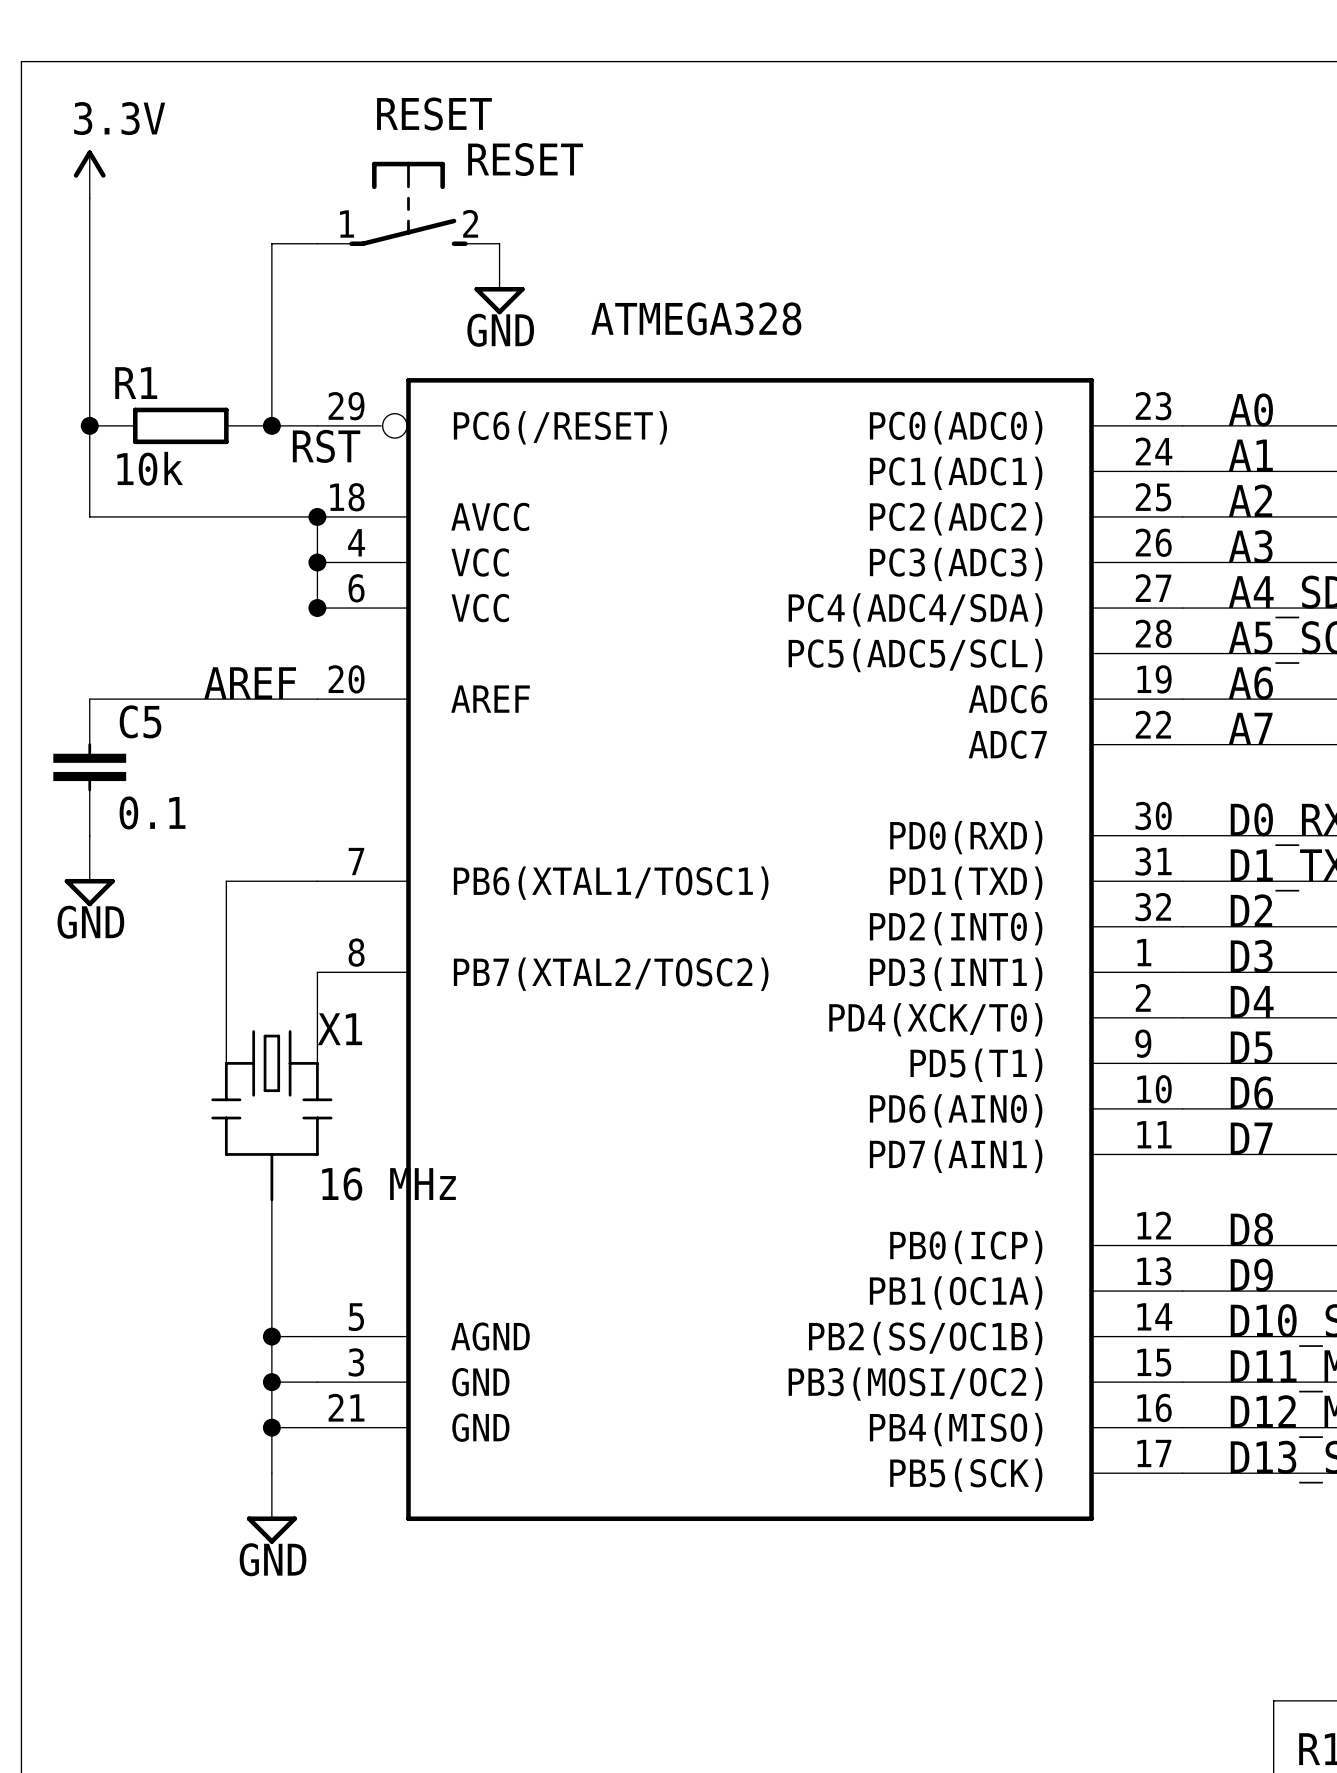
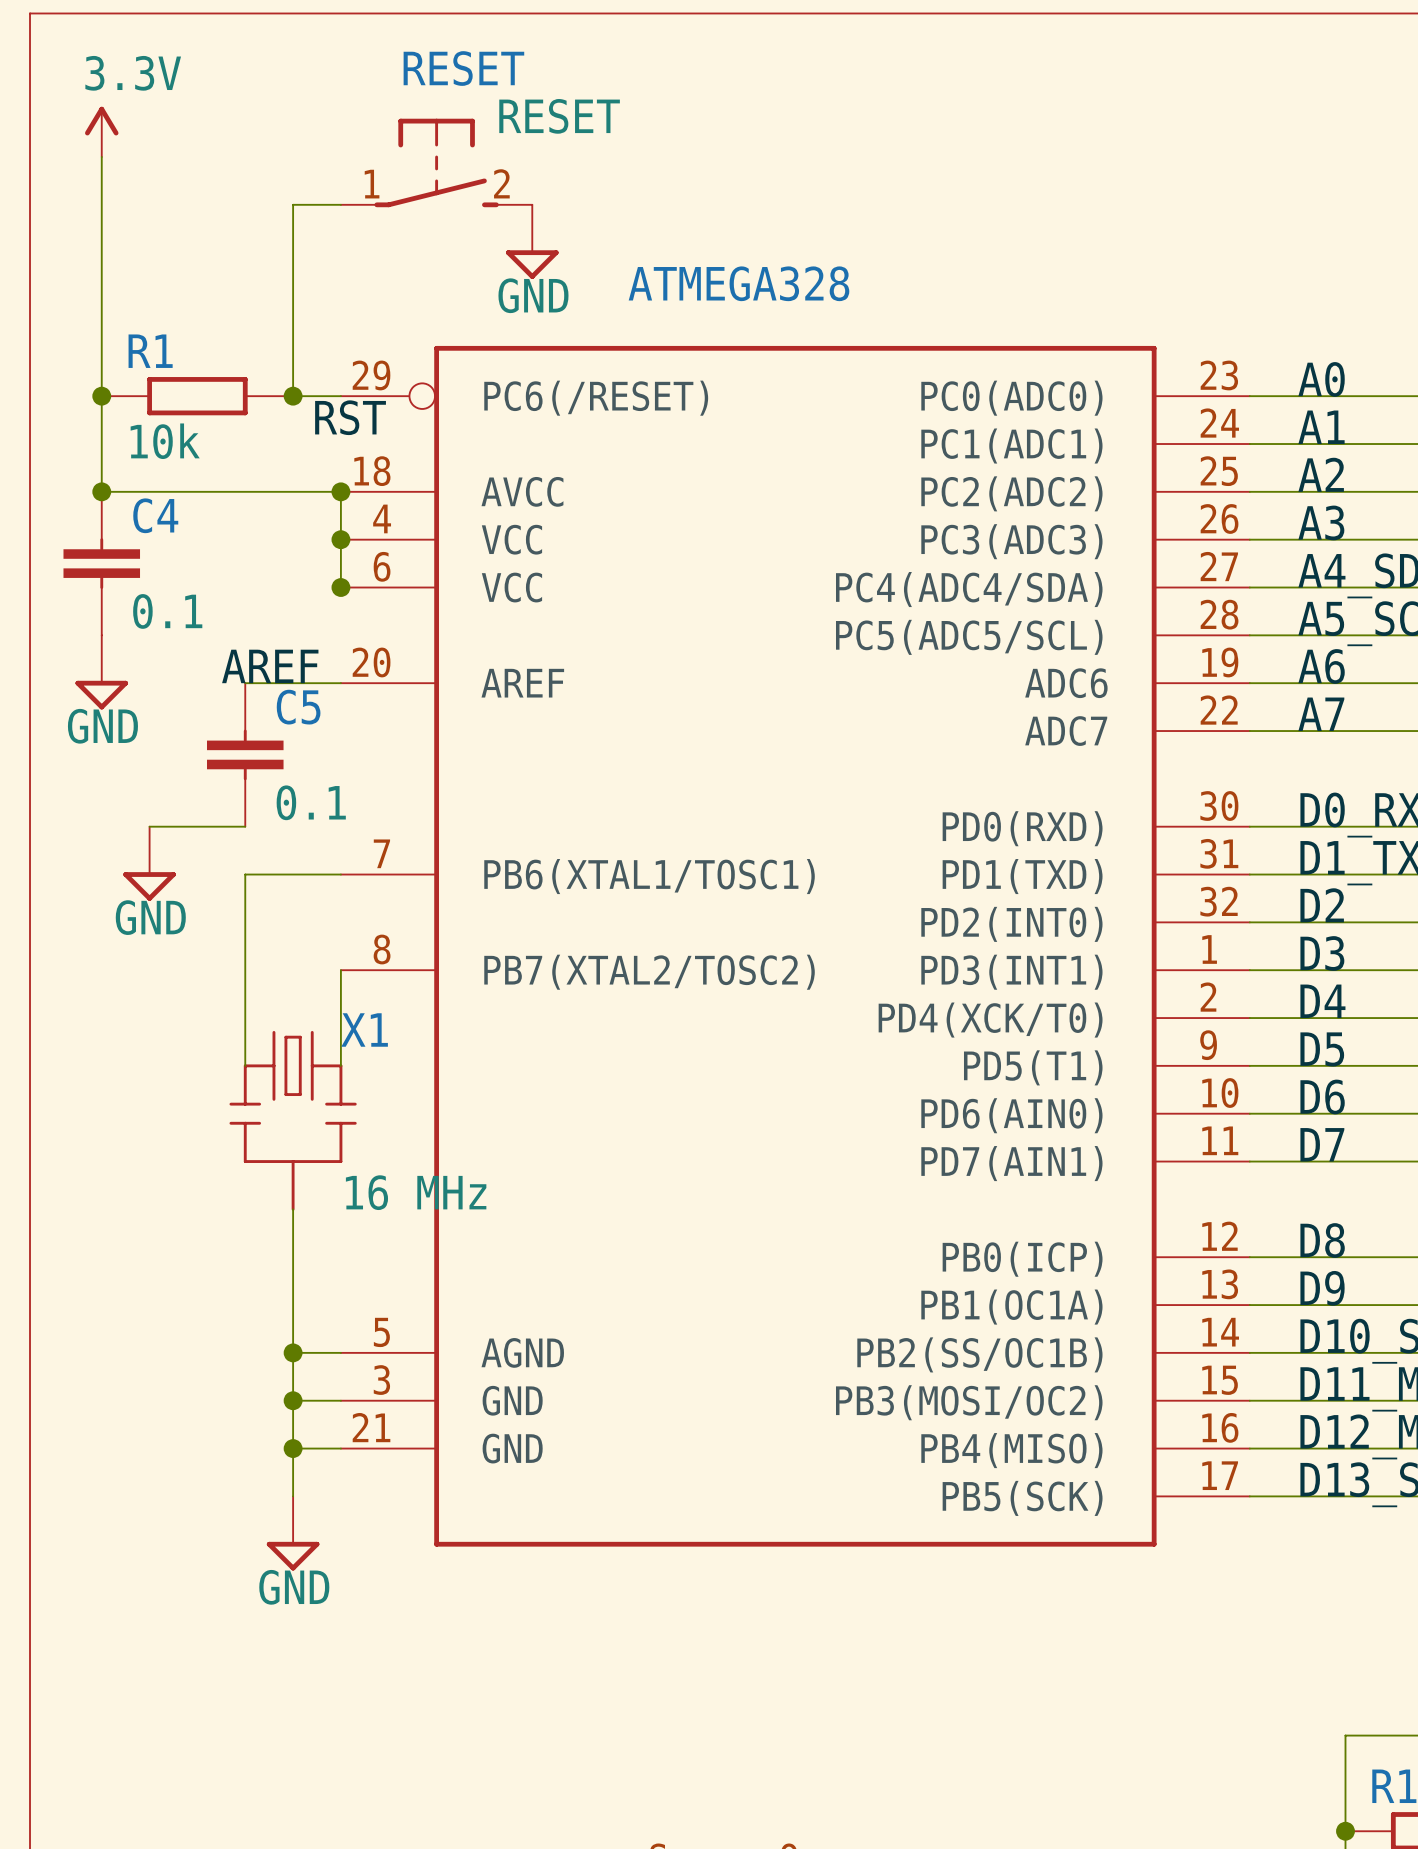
junction: none -> (101, 491)
C4: none -> 0.1 (101, 563)
power symbol: none -> GND (101, 672)
wire: (89, 699) (226, 699) -> none
C5 position: (89, 767) -> (245, 754)
wire: none -> (149, 826) (245, 826)
power symbol position: GND (89, 870) -> GND (149, 863)

